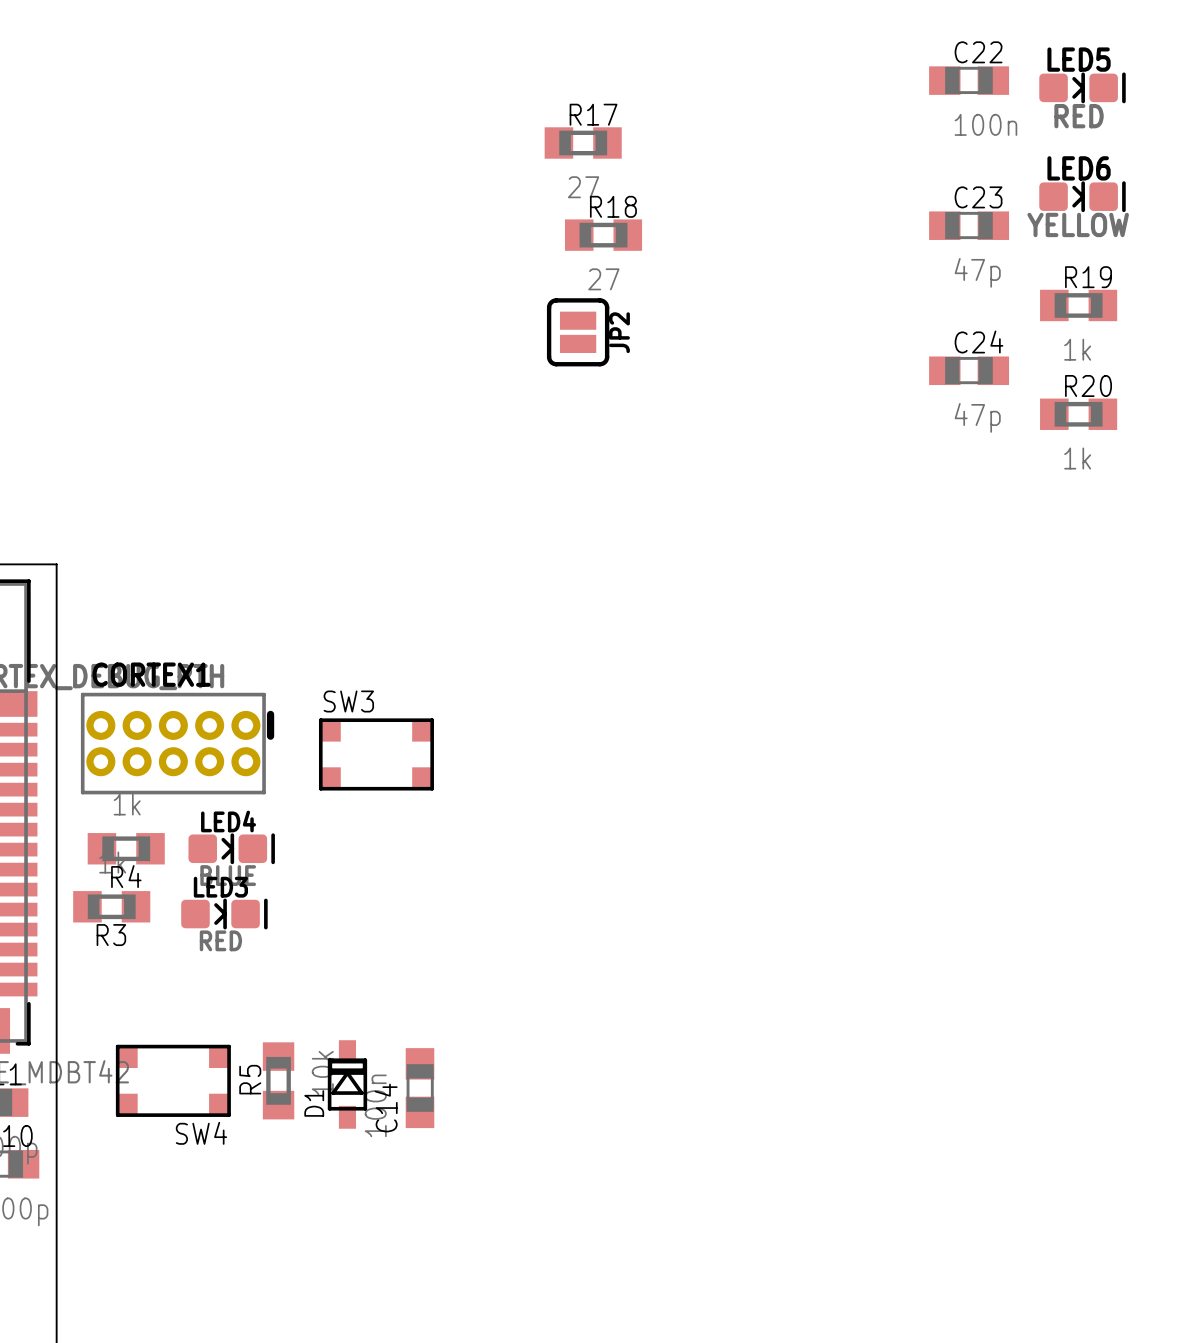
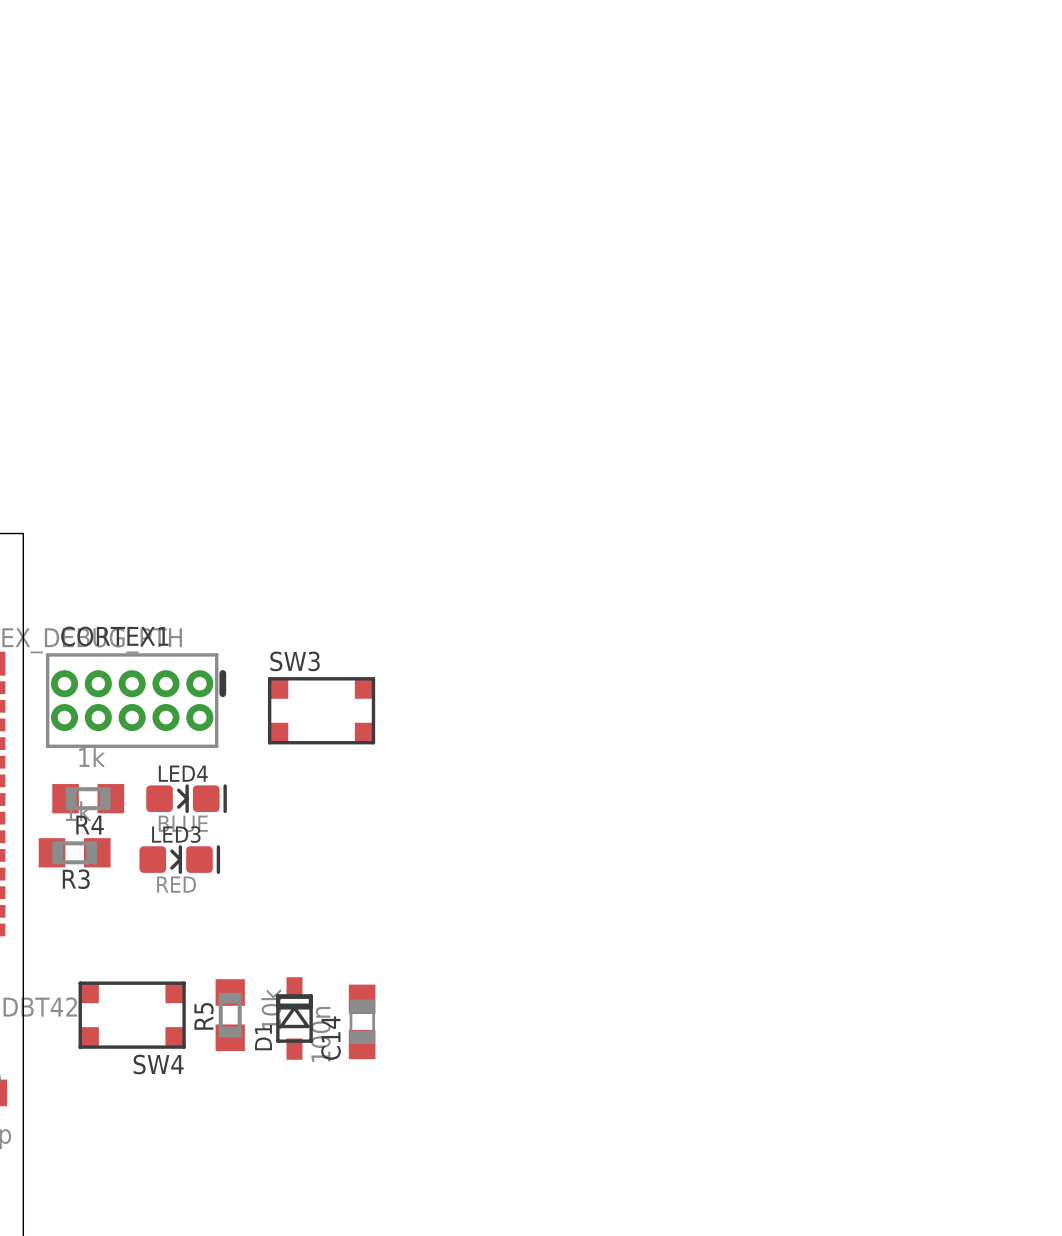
C22: 100n (969, 80) -> none
LED5: RED (1082, 87) -> none
R17: 27 (583, 143) -> none
LED6: YELLOW (1082, 196) -> none
C23: 47p (969, 225) -> none
R18: 27 (603, 235) -> none
R19: 1k (1078, 305) -> none
JP2: (578, 332) -> none
C24: 47p (969, 370) -> none
R20: 1k (1078, 414) -> none

